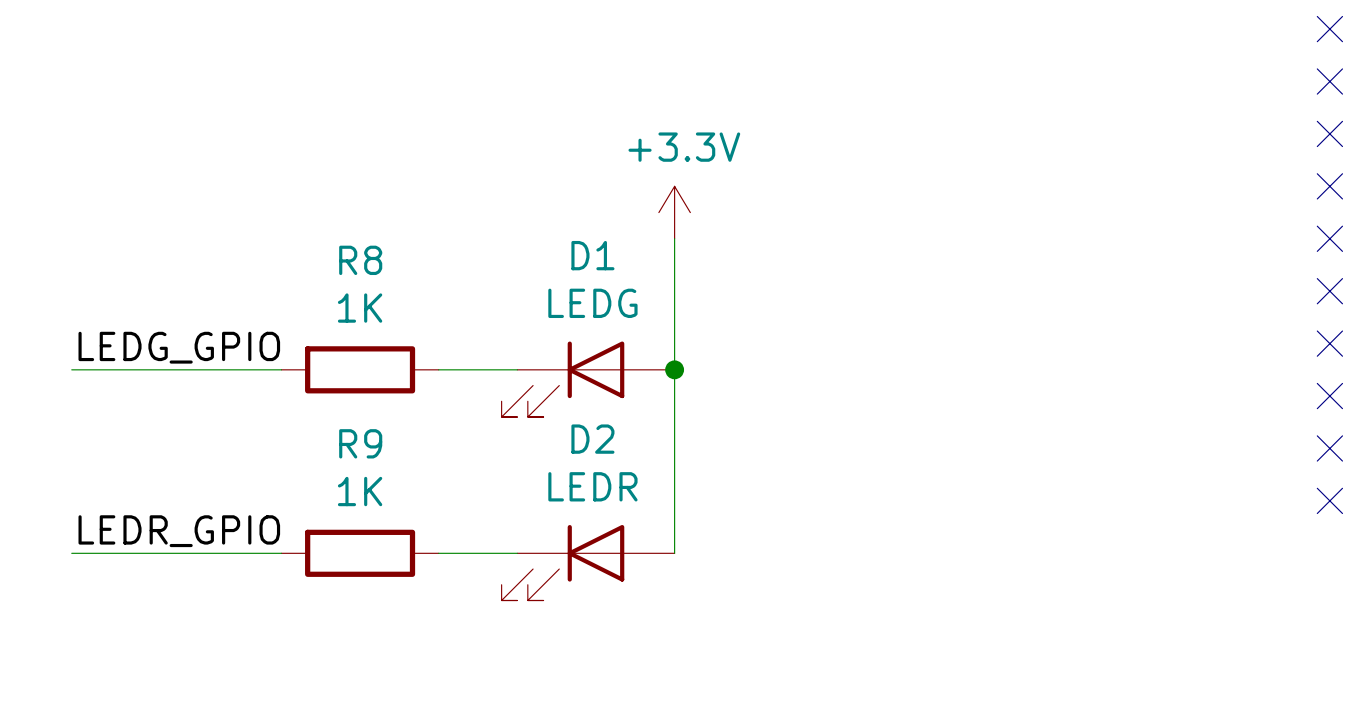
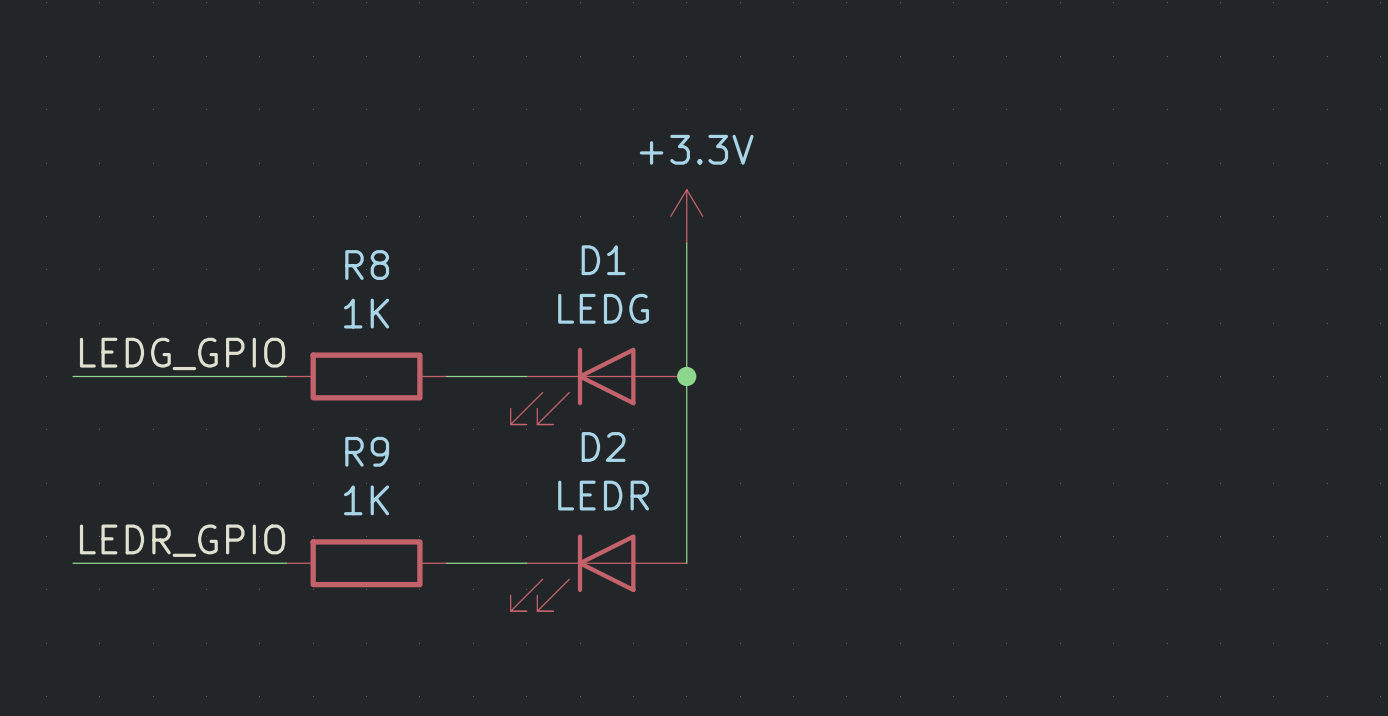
no-connect mark: (1329, 29) -> none
no-connect mark: (1329, 81) -> none
no-connect mark: (1329, 133) -> none
no-connect mark: (1329, 186) -> none
no-connect mark: (1329, 238) -> none
no-connect mark: (1329, 291) -> none
no-connect mark: (1329, 343) -> none
no-connect mark: (1329, 396) -> none
no-connect mark: (1329, 448) -> none
no-connect mark: (1329, 500) -> none

